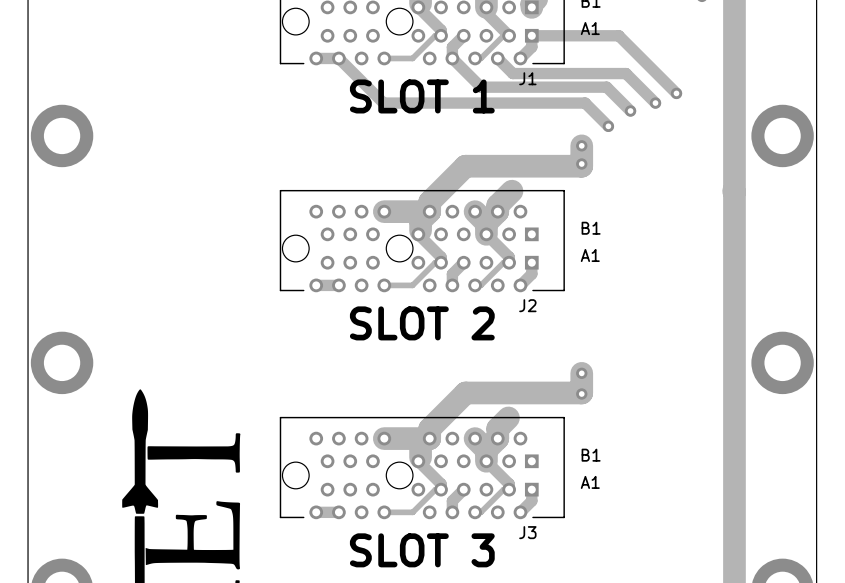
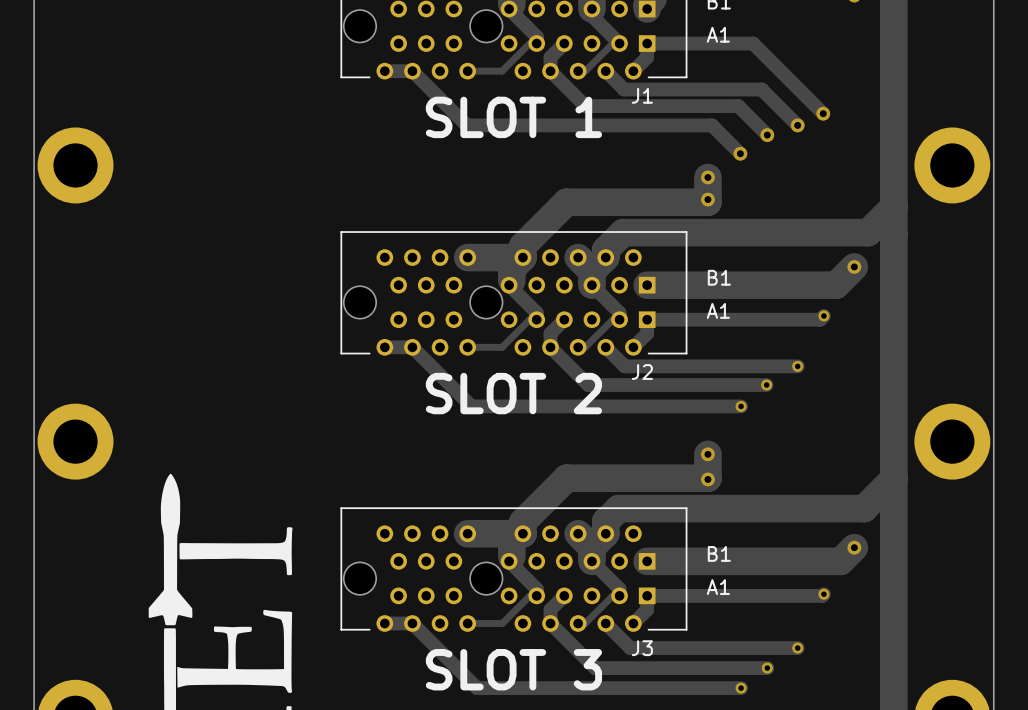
track: none -> (893, 206) (868, 232) (623, 232)
track: none -> (854, 266) (836, 285) (647, 285)
via: none -> (854, 266)
track: none -> (823, 315) (820, 319) (647, 319)
via: none -> (823, 315)
track: none -> (412, 347) (471, 406) (741, 406)
track: none -> (550, 347) (588, 385) (766, 385)
track: none -> (605, 347) (624, 366) (797, 366)
via: none -> (797, 366)
via: none -> (766, 385)
via: none -> (741, 406)
track: none -> (893, 478) (864, 508) (618, 508)
track: none -> (854, 547) (840, 561) (647, 561)
via: none -> (854, 547)
track: none -> (823, 594) (822, 595) (647, 595)
via: none -> (823, 594)
track: none -> (412, 623) (477, 688) (741, 688)
track: none -> (550, 623) (595, 668) (767, 668)
track: none -> (605, 623) (630, 648) (797, 648)
via: none -> (797, 648)
via: none -> (767, 668)
via: none -> (741, 688)

